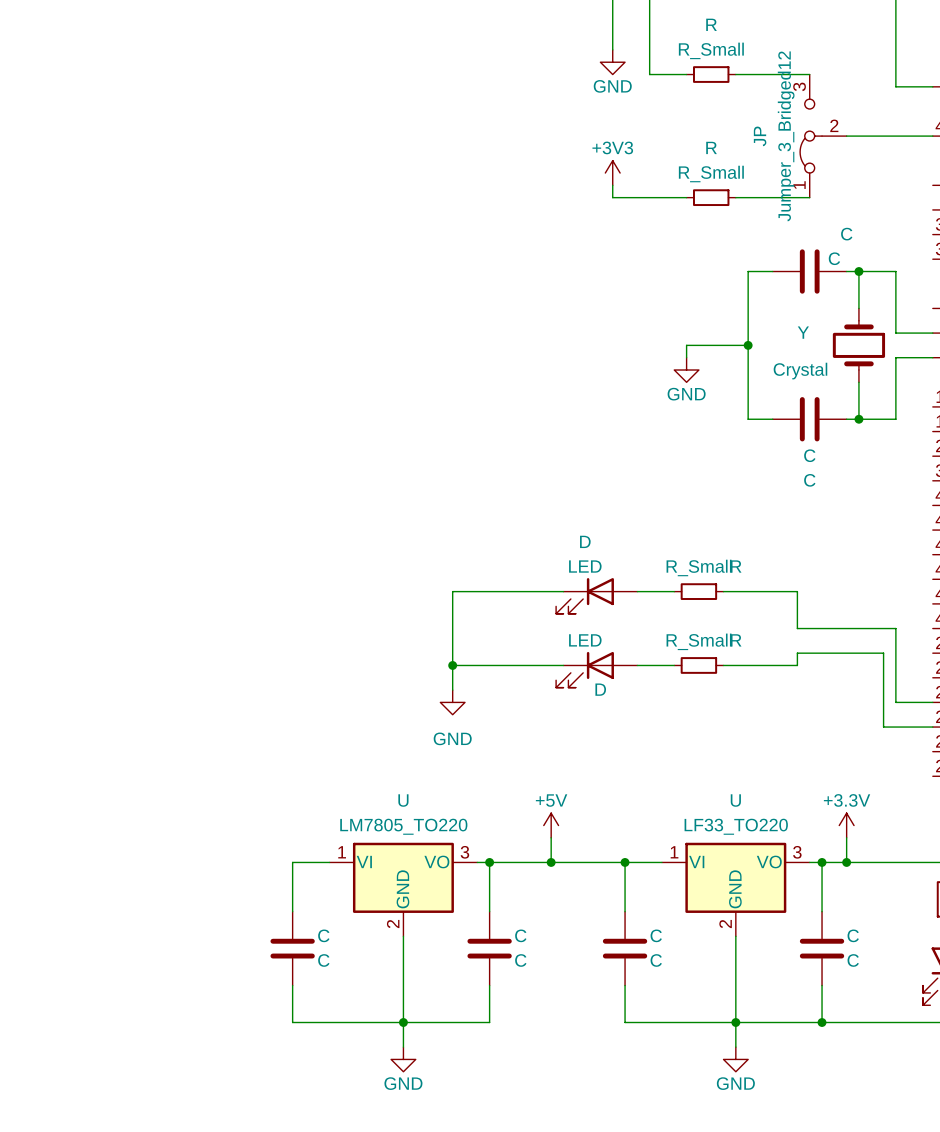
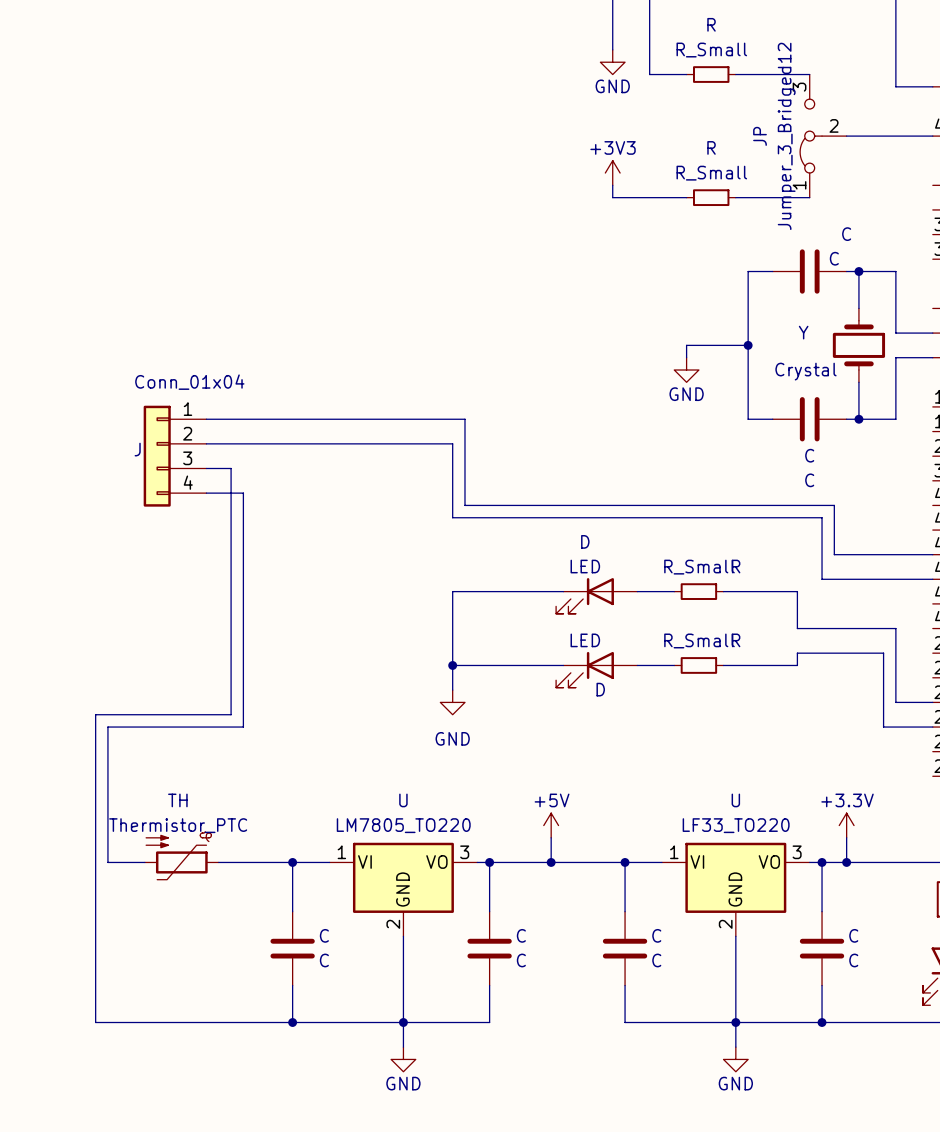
wire: none -> (206, 419) (464, 419) (464, 505) (834, 505) (834, 554) (932, 554)
wire: none -> (206, 443) (452, 443) (452, 517) (822, 517) (822, 579) (932, 579)
J: none -> Conn_01x04 (175, 456)
wire: none -> (206, 468) (231, 468) (231, 714) (95, 714) (95, 1022) (292, 1022)
wire: none -> (206, 493) (243, 493) (243, 727) (107, 727) (107, 862) (144, 862)
TH: none -> Thermistor_PTC (181, 855)
wire: none -> (218, 862) (292, 862)
junction: none -> (292, 862)
junction: none -> (292, 1022)

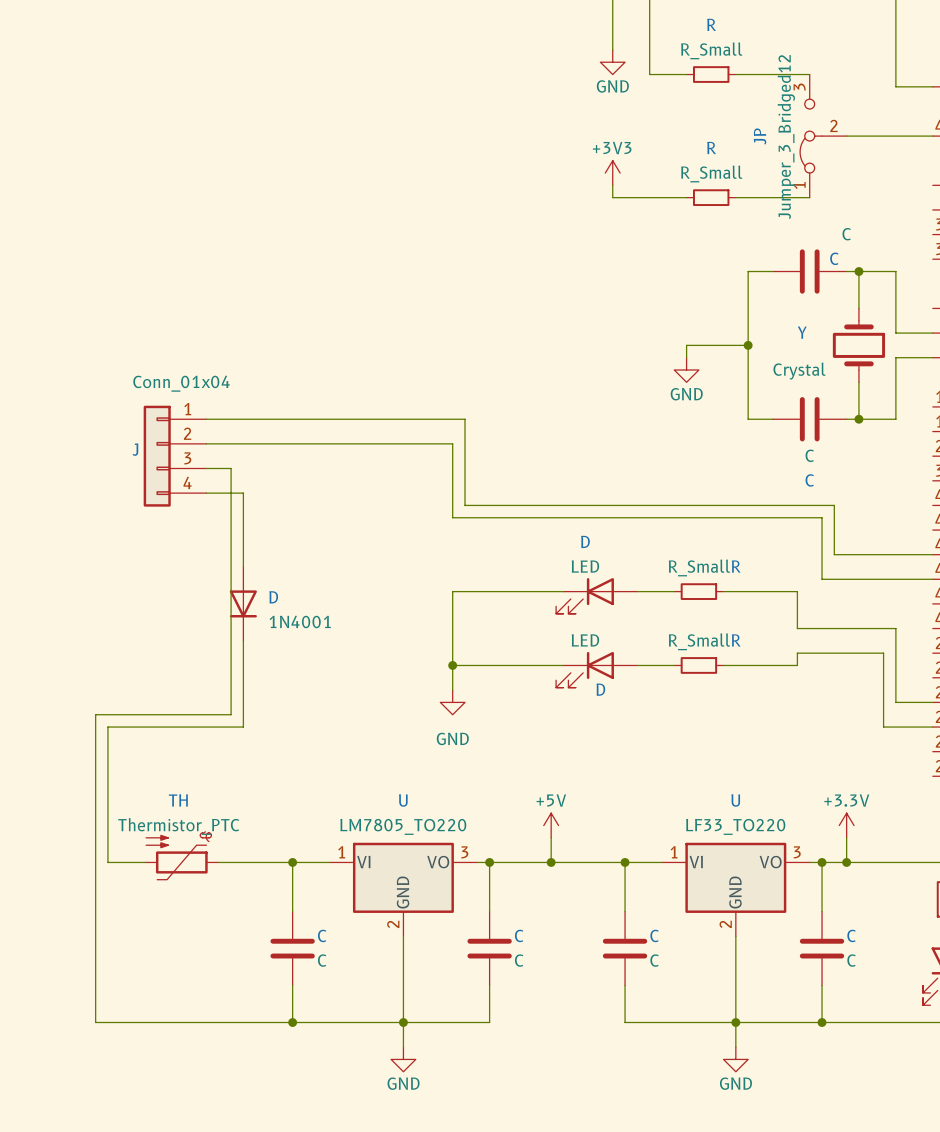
D: none -> 1N4001 (243, 603)

